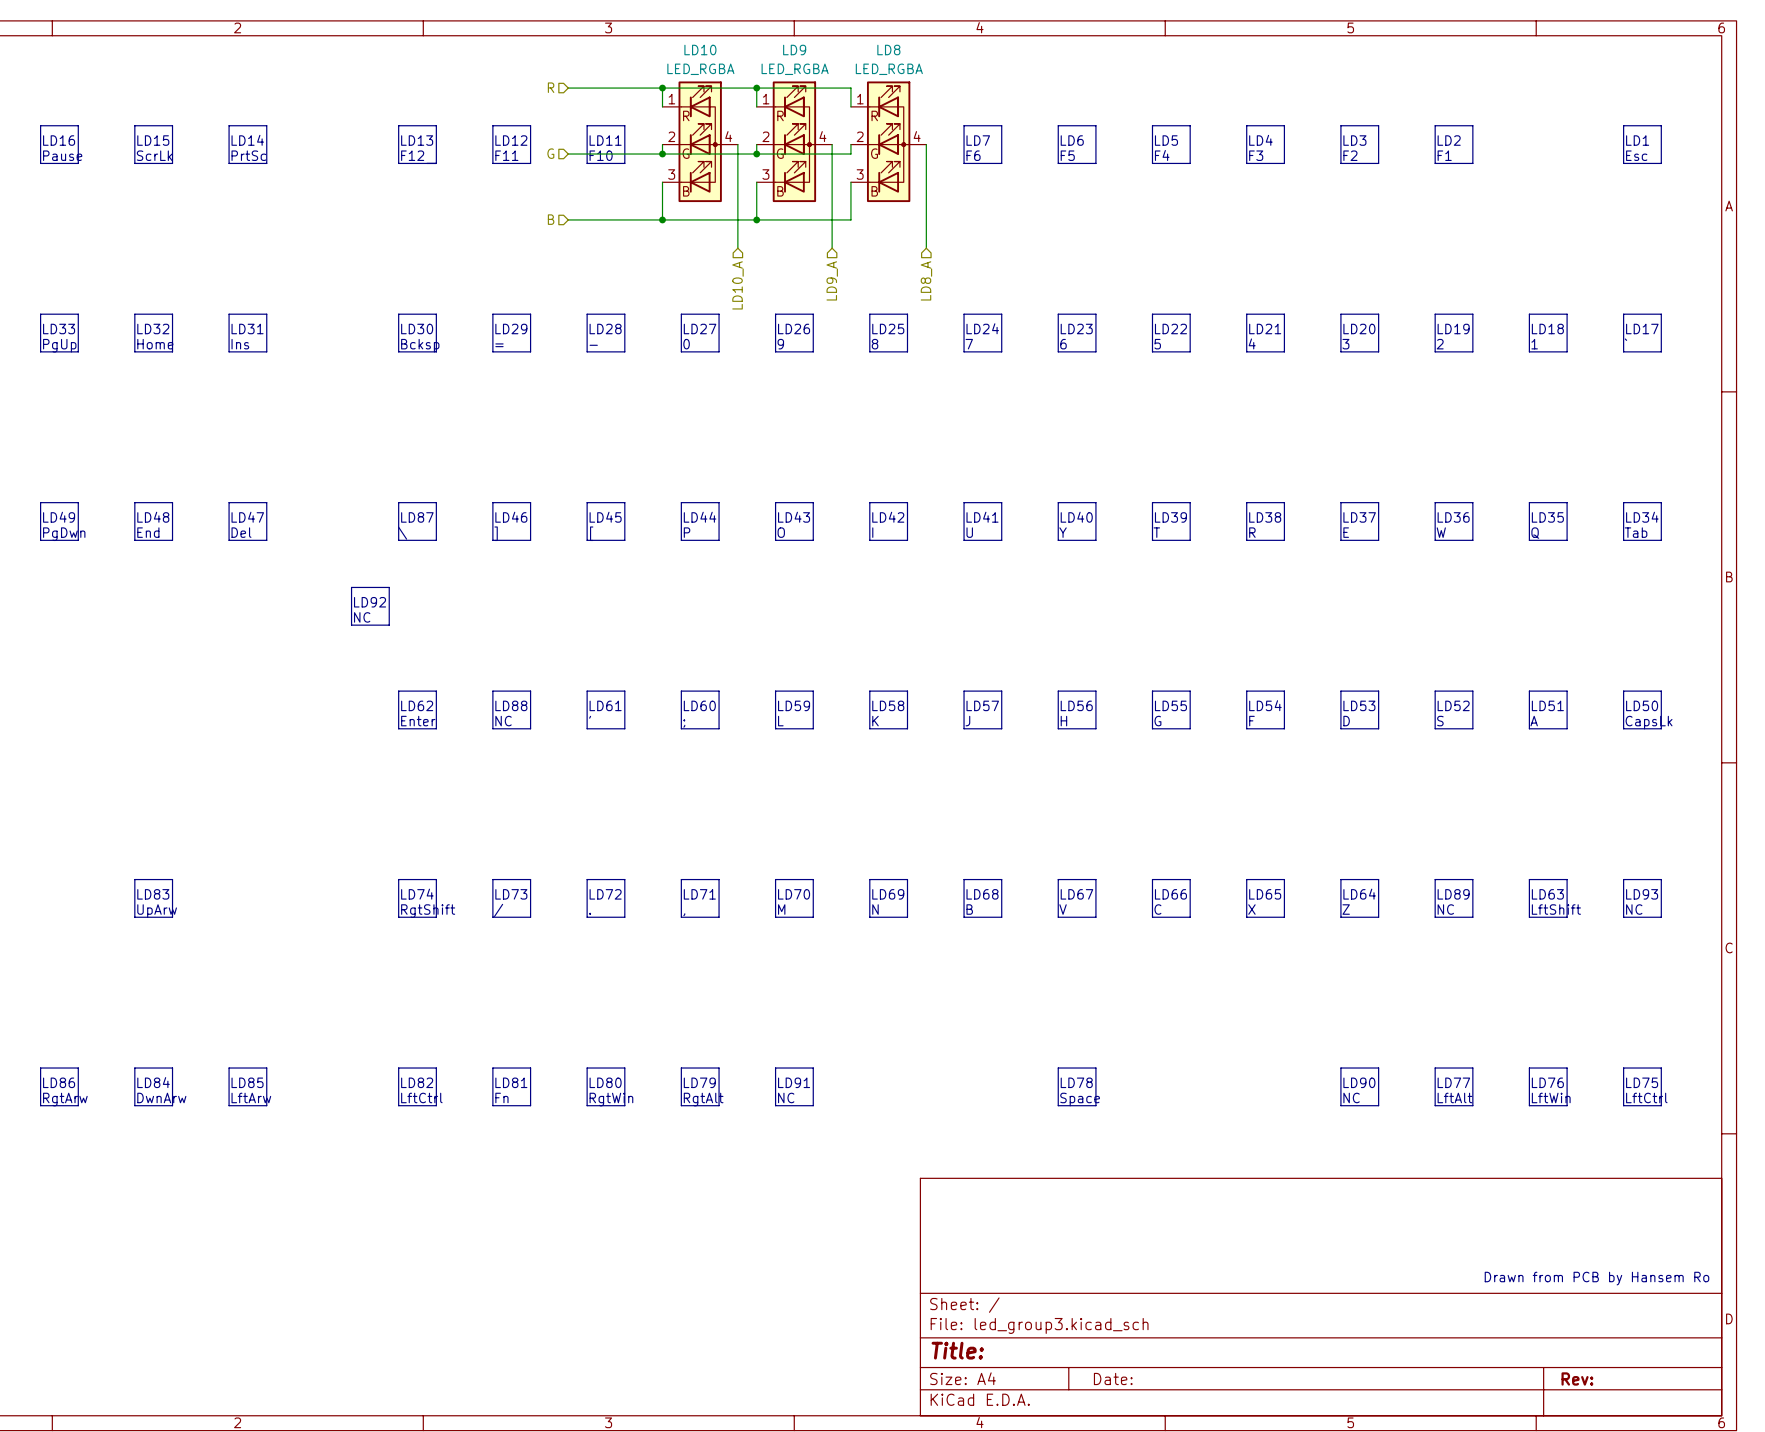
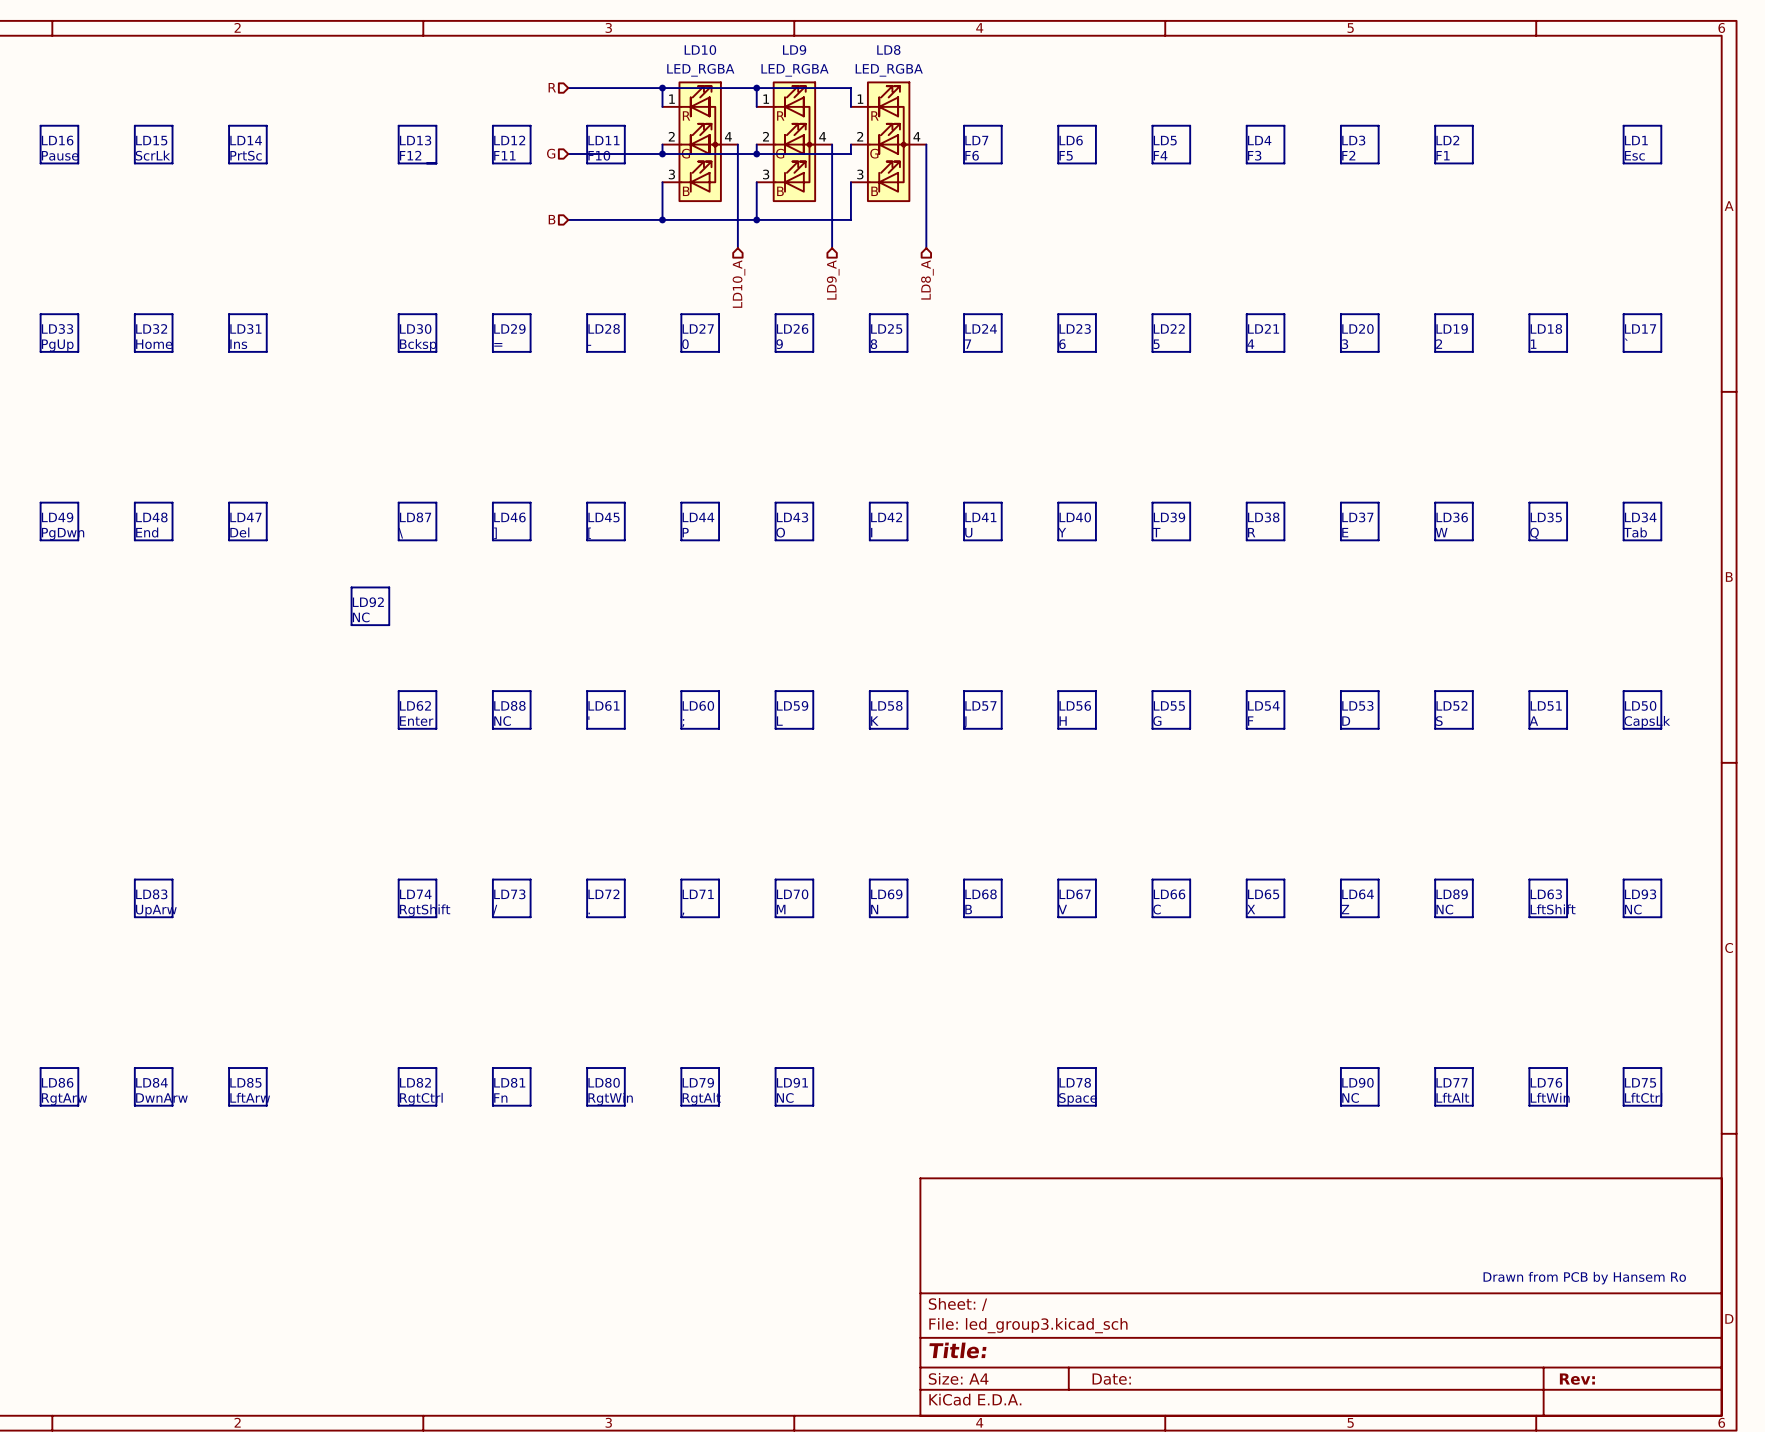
text: LftCtrl (421, 1097) -> RgtCtrl (421, 1099)

